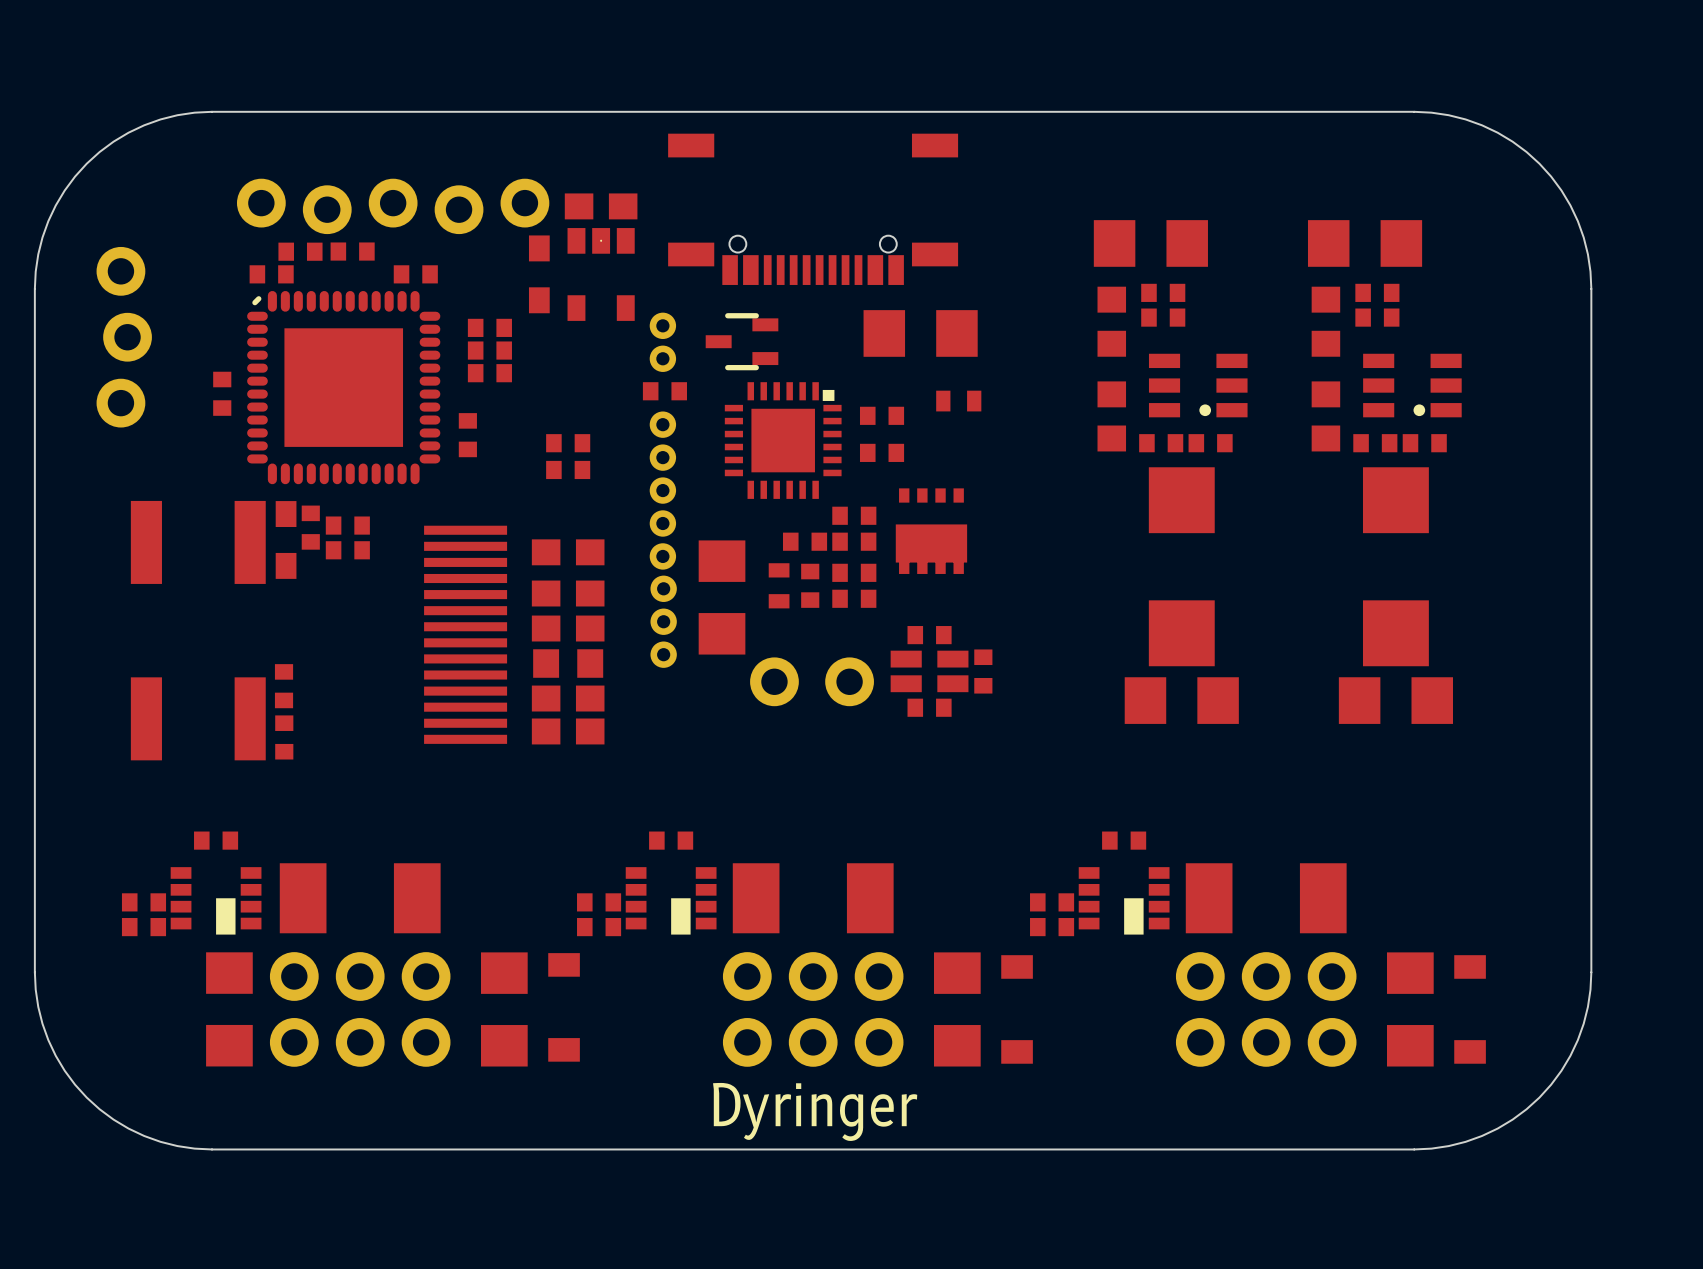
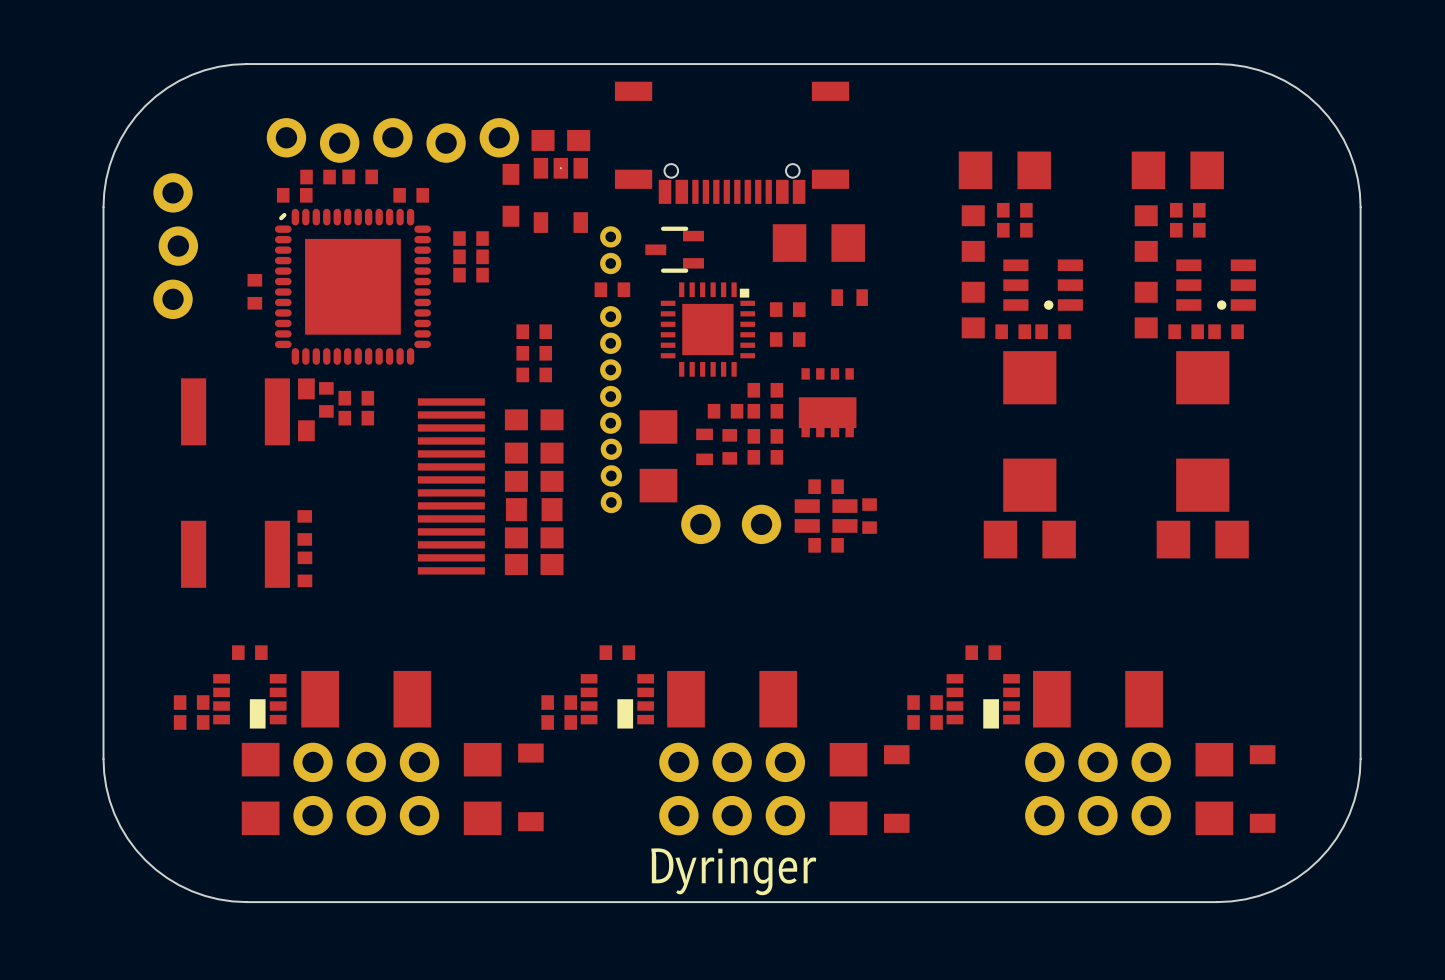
part rotation: 0° (467, 435) -> 90° clockwise (534, 374)
part position: (467, 435) -> (534, 374)

